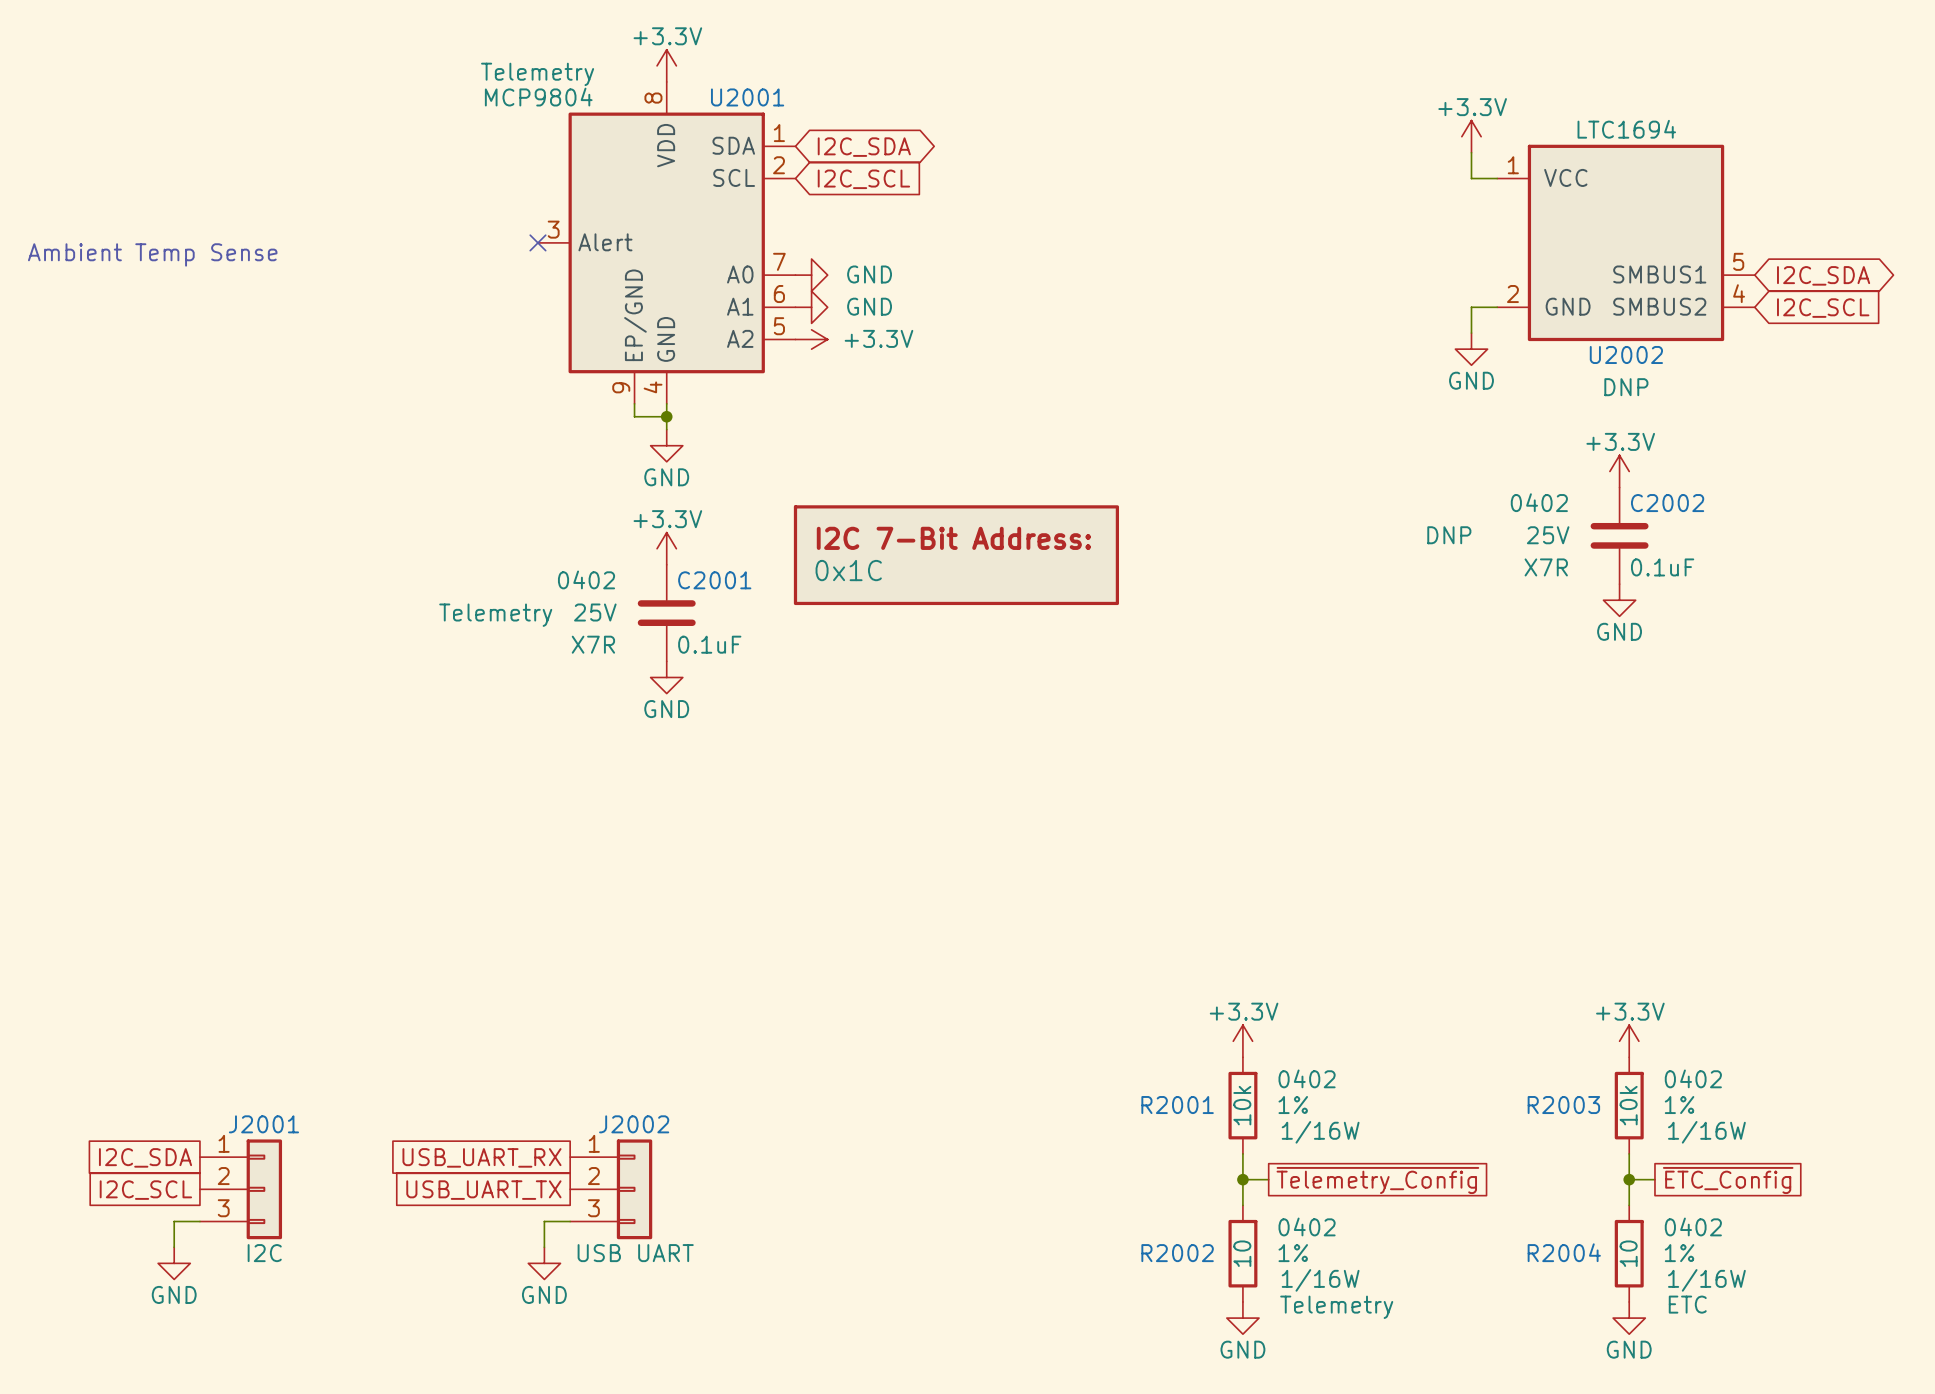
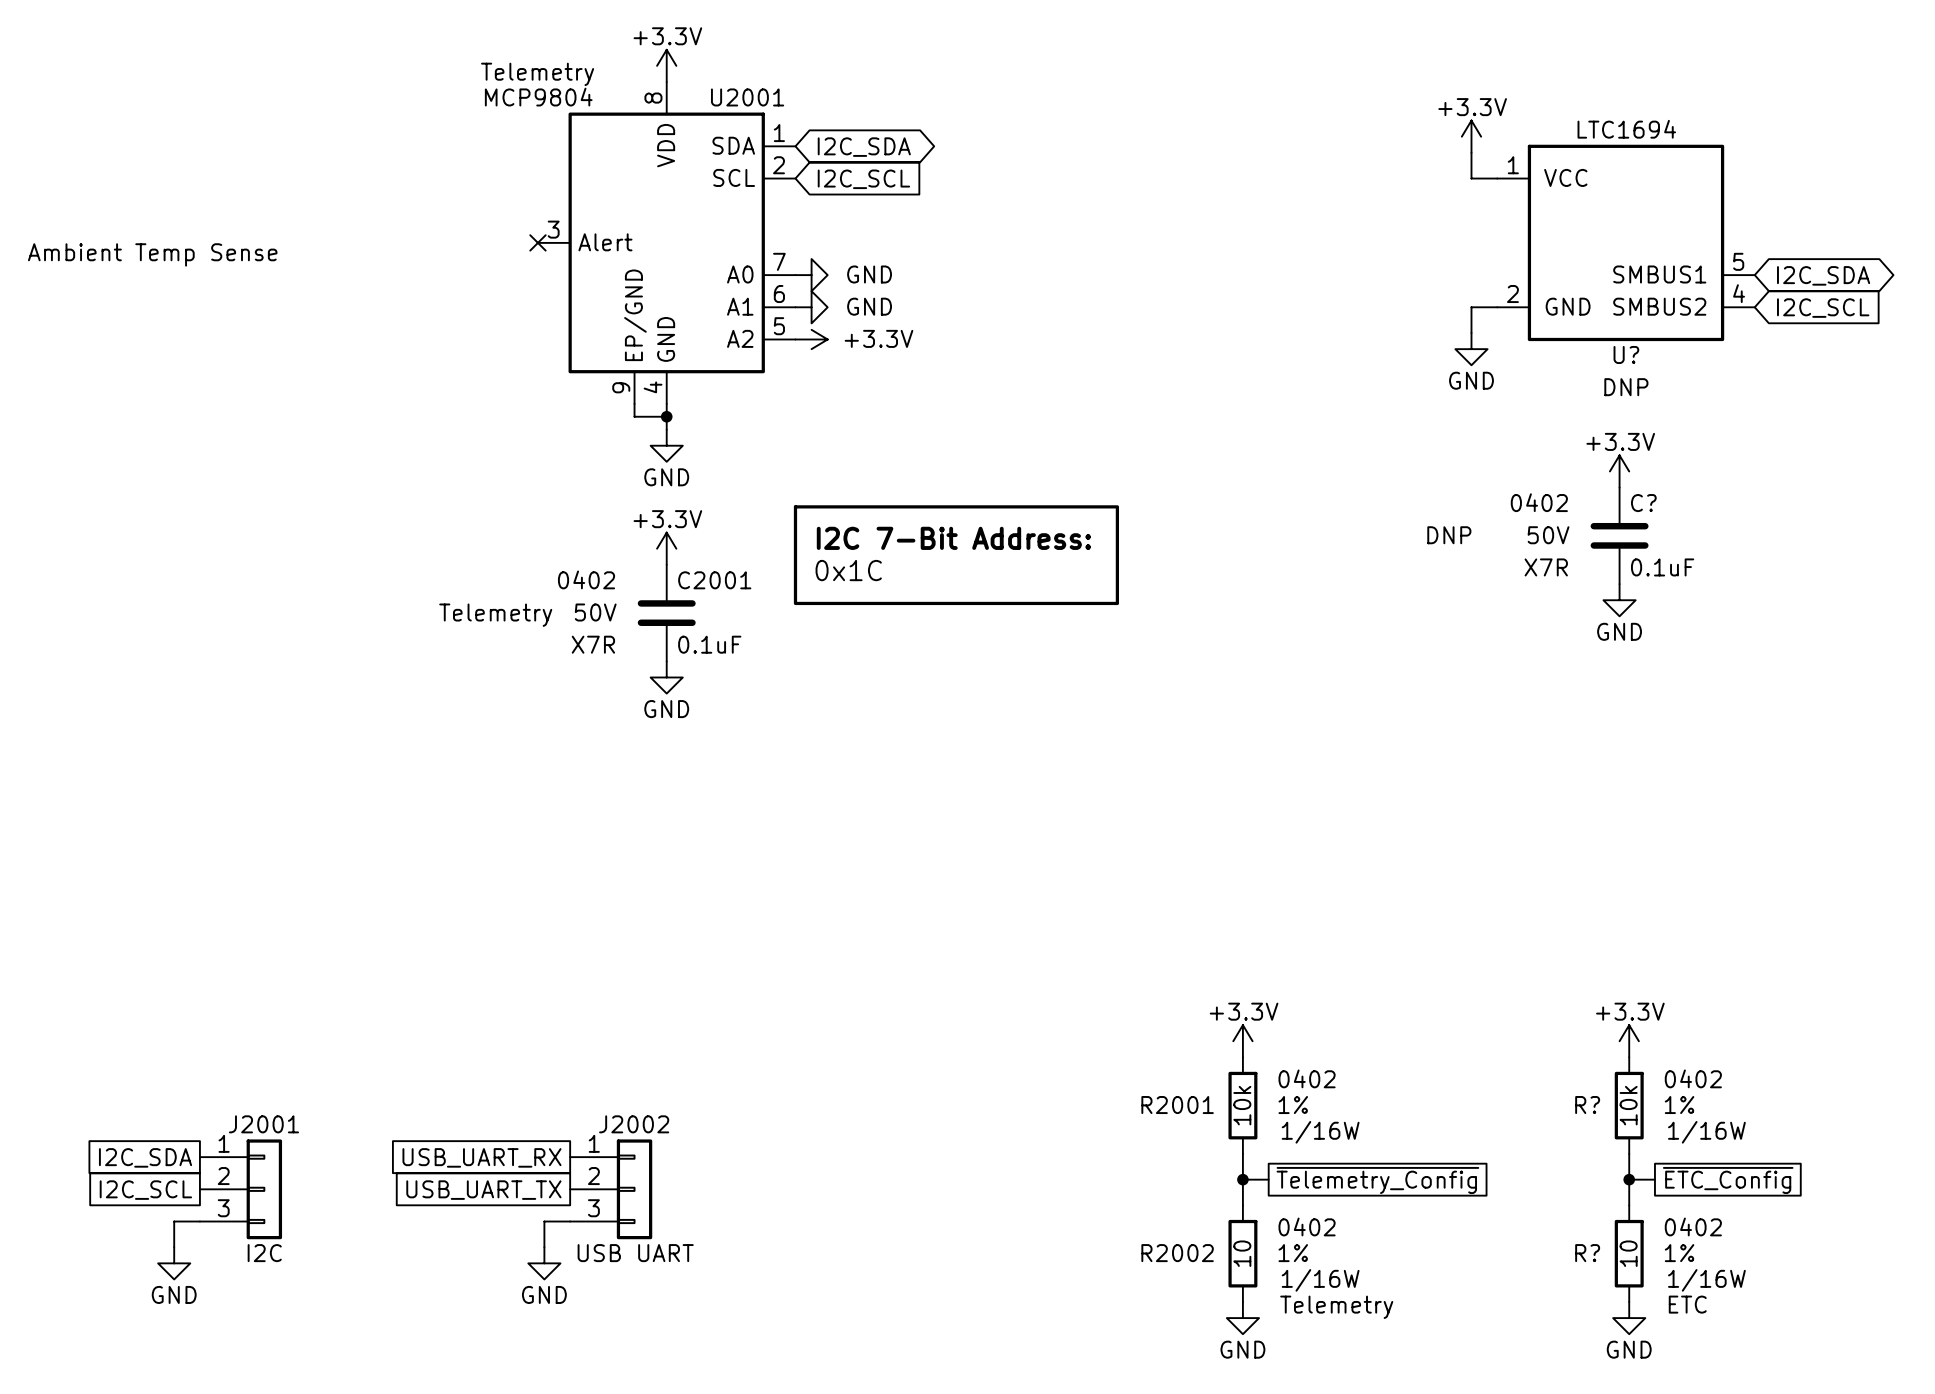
U2002 name: U2002 (1626, 354) -> U? (1626, 354)
C2002 name: C2002 (1667, 503) -> C? (1643, 503)
C2002 text: 25V (1548, 535) -> 50V (1548, 535)
C2001 text: 25V (595, 612) -> 50V (595, 612)
R2003 name: R2003 (1563, 1105) -> R? (1587, 1105)
R2004 name: R2004 (1564, 1252) -> R? (1587, 1253)

